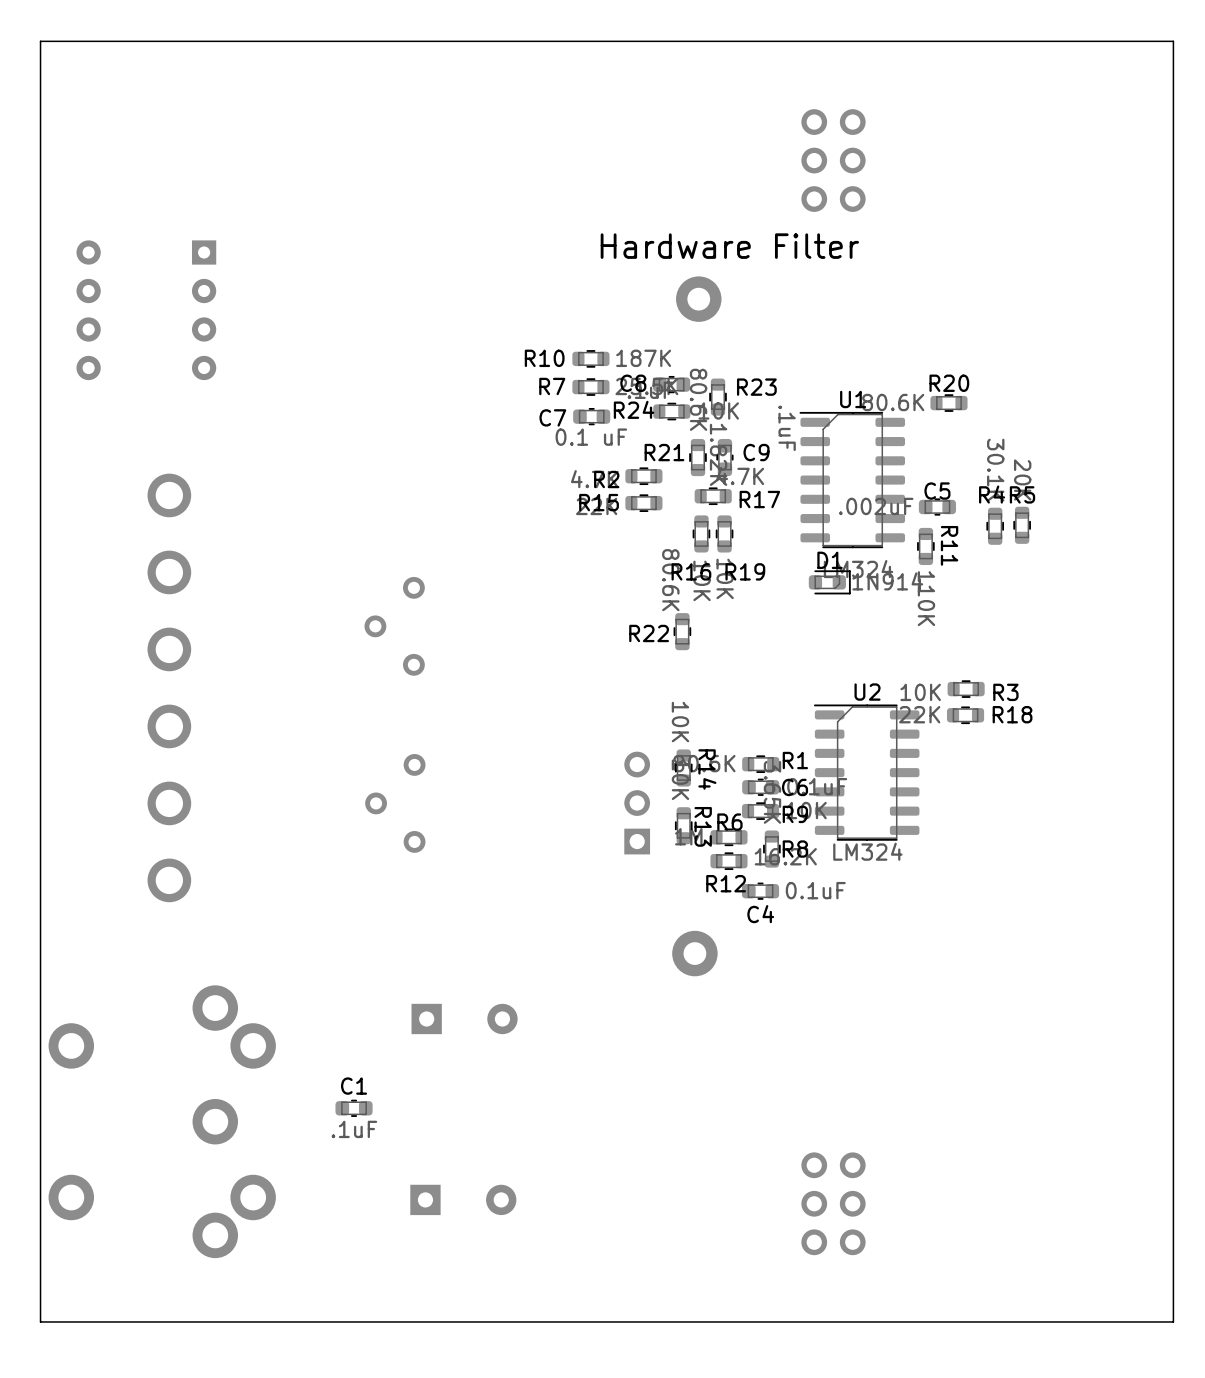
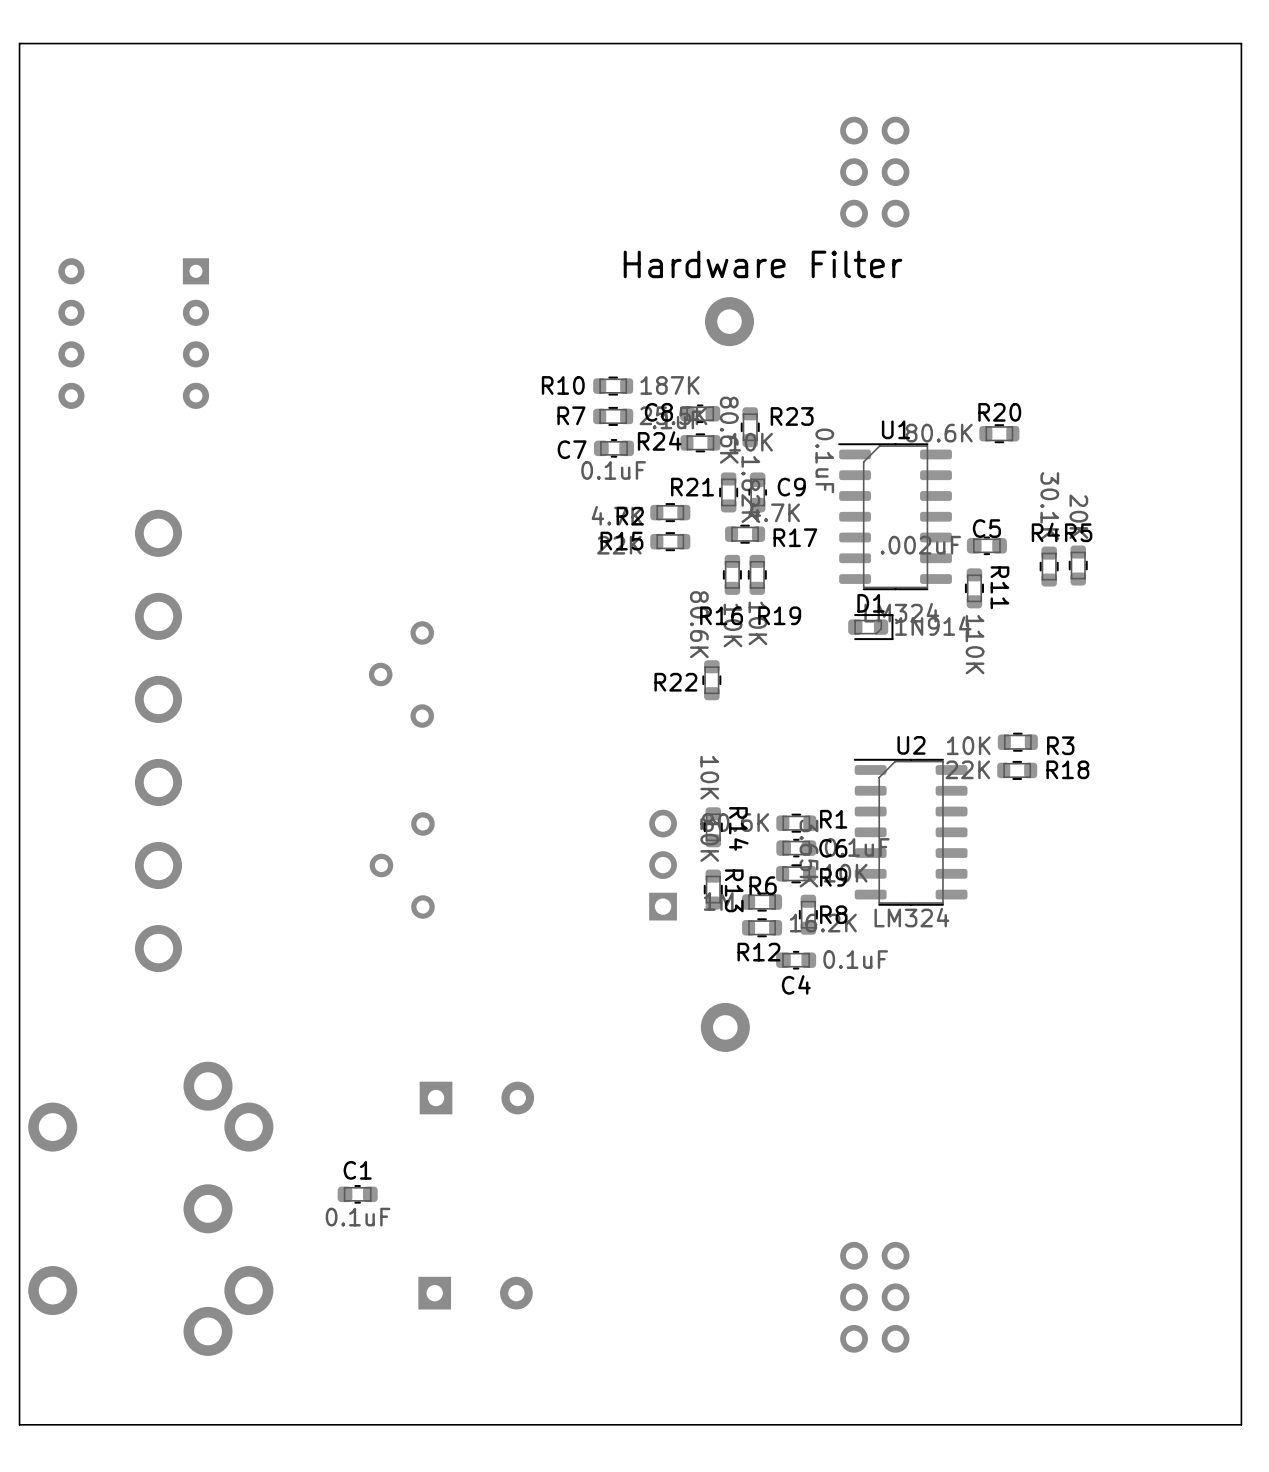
C9 value: .1uF (787, 428) -> 0.1uF (824, 460)
C7 value: 0.1 uF (591, 437) -> 0.1uF (613, 470)
C1 value: .1uF (354, 1129) -> 0.1uF (358, 1217)

